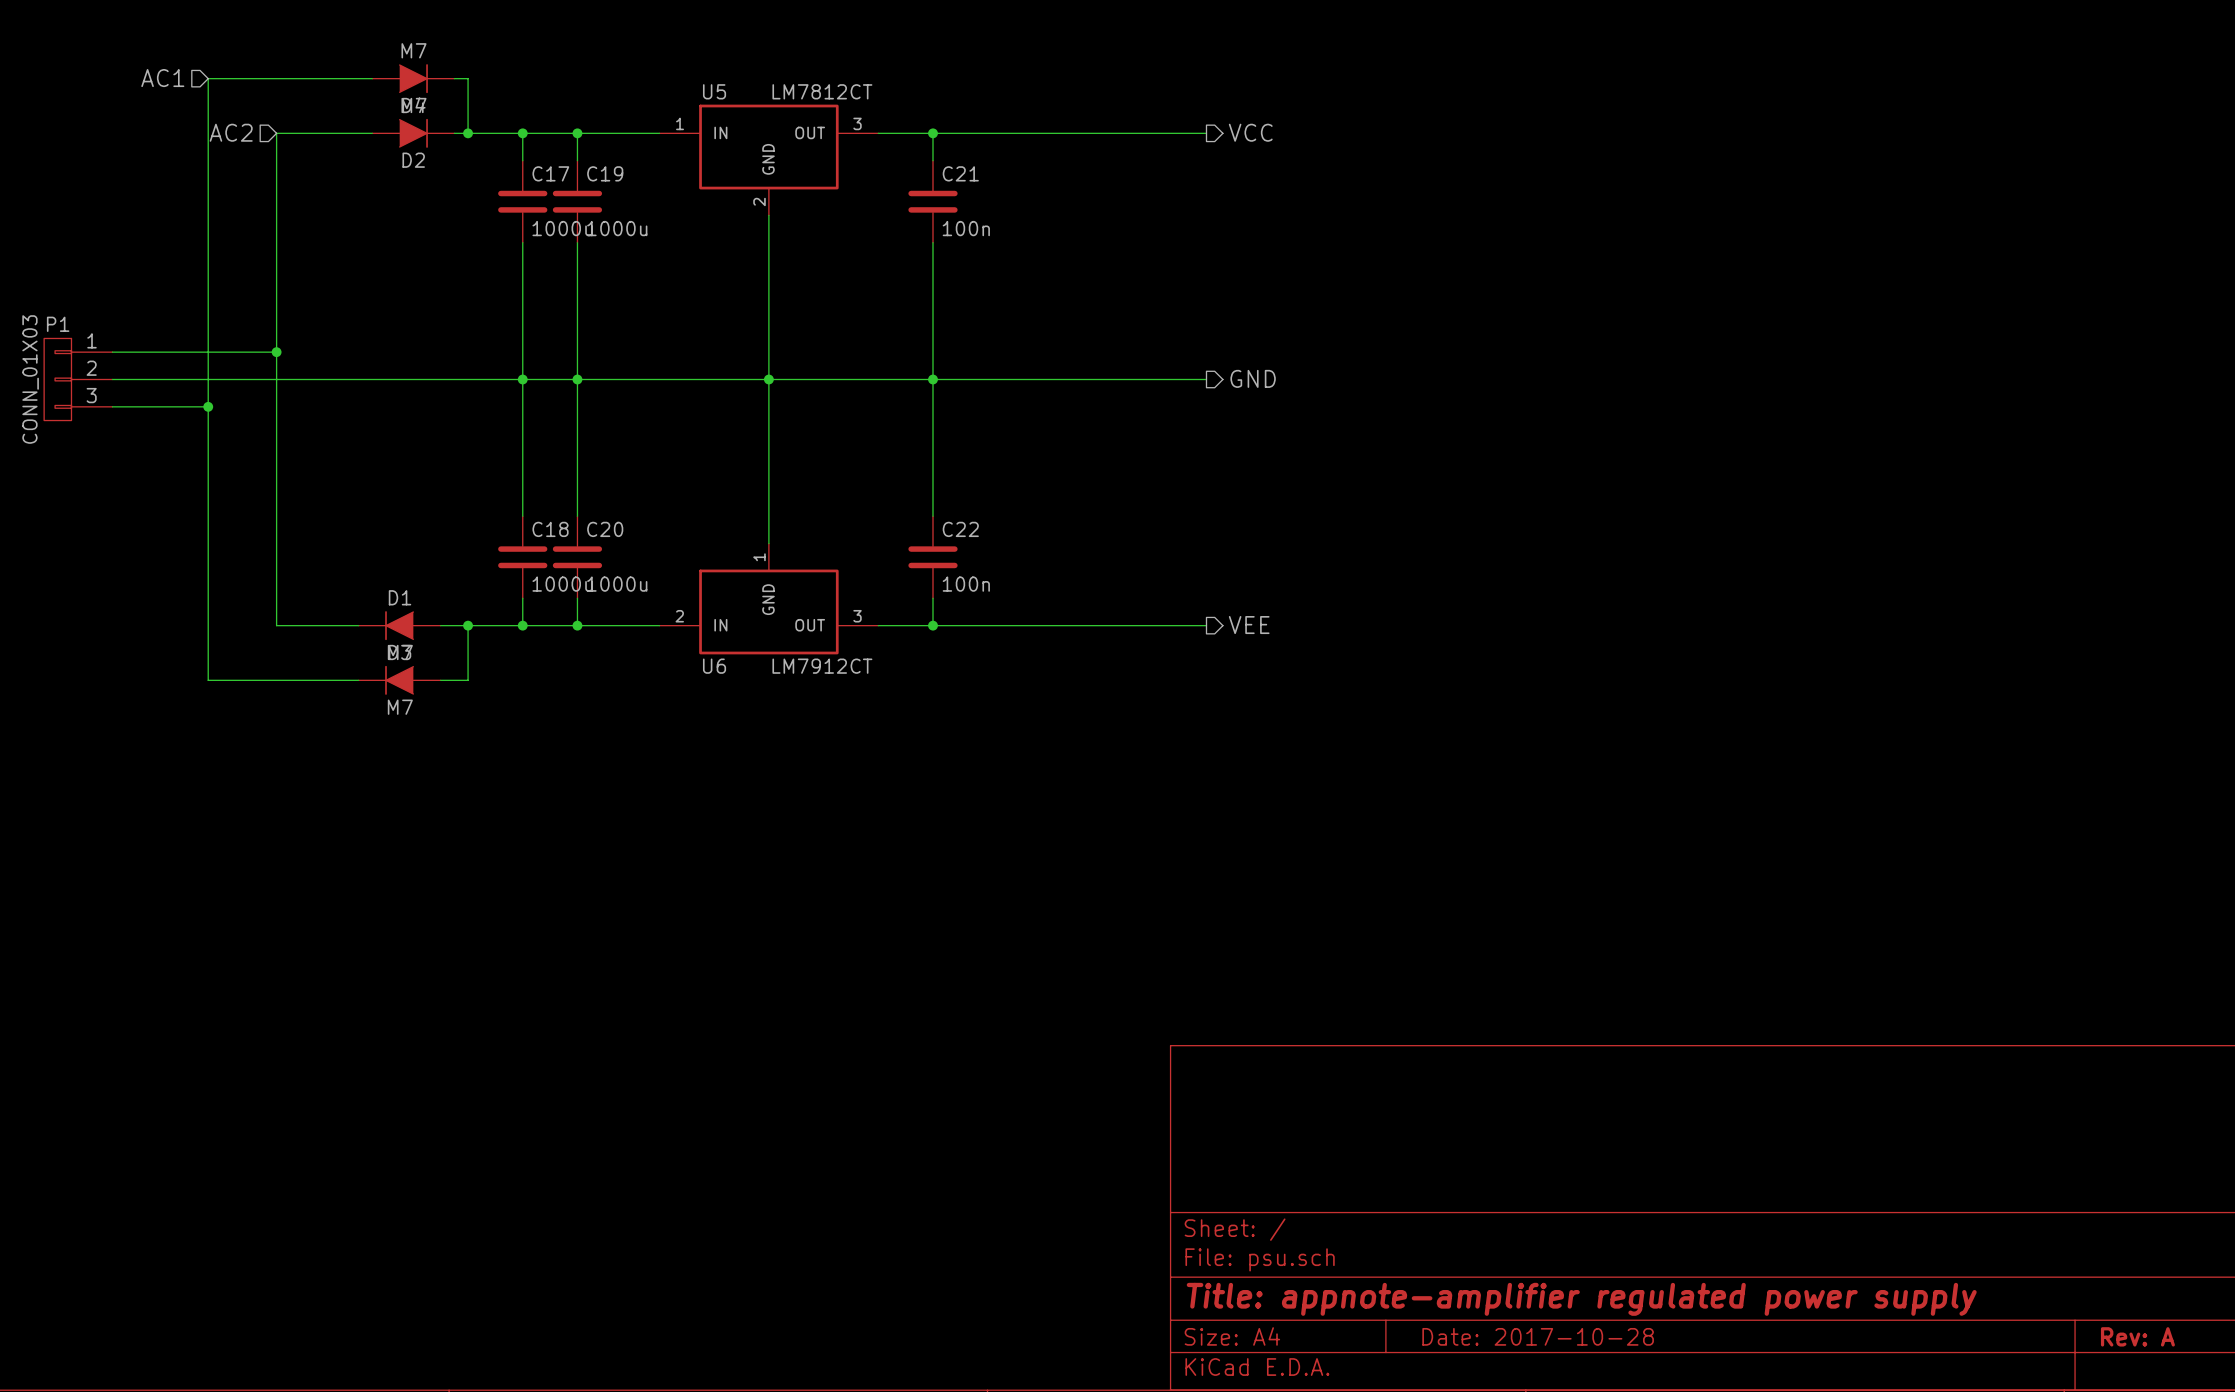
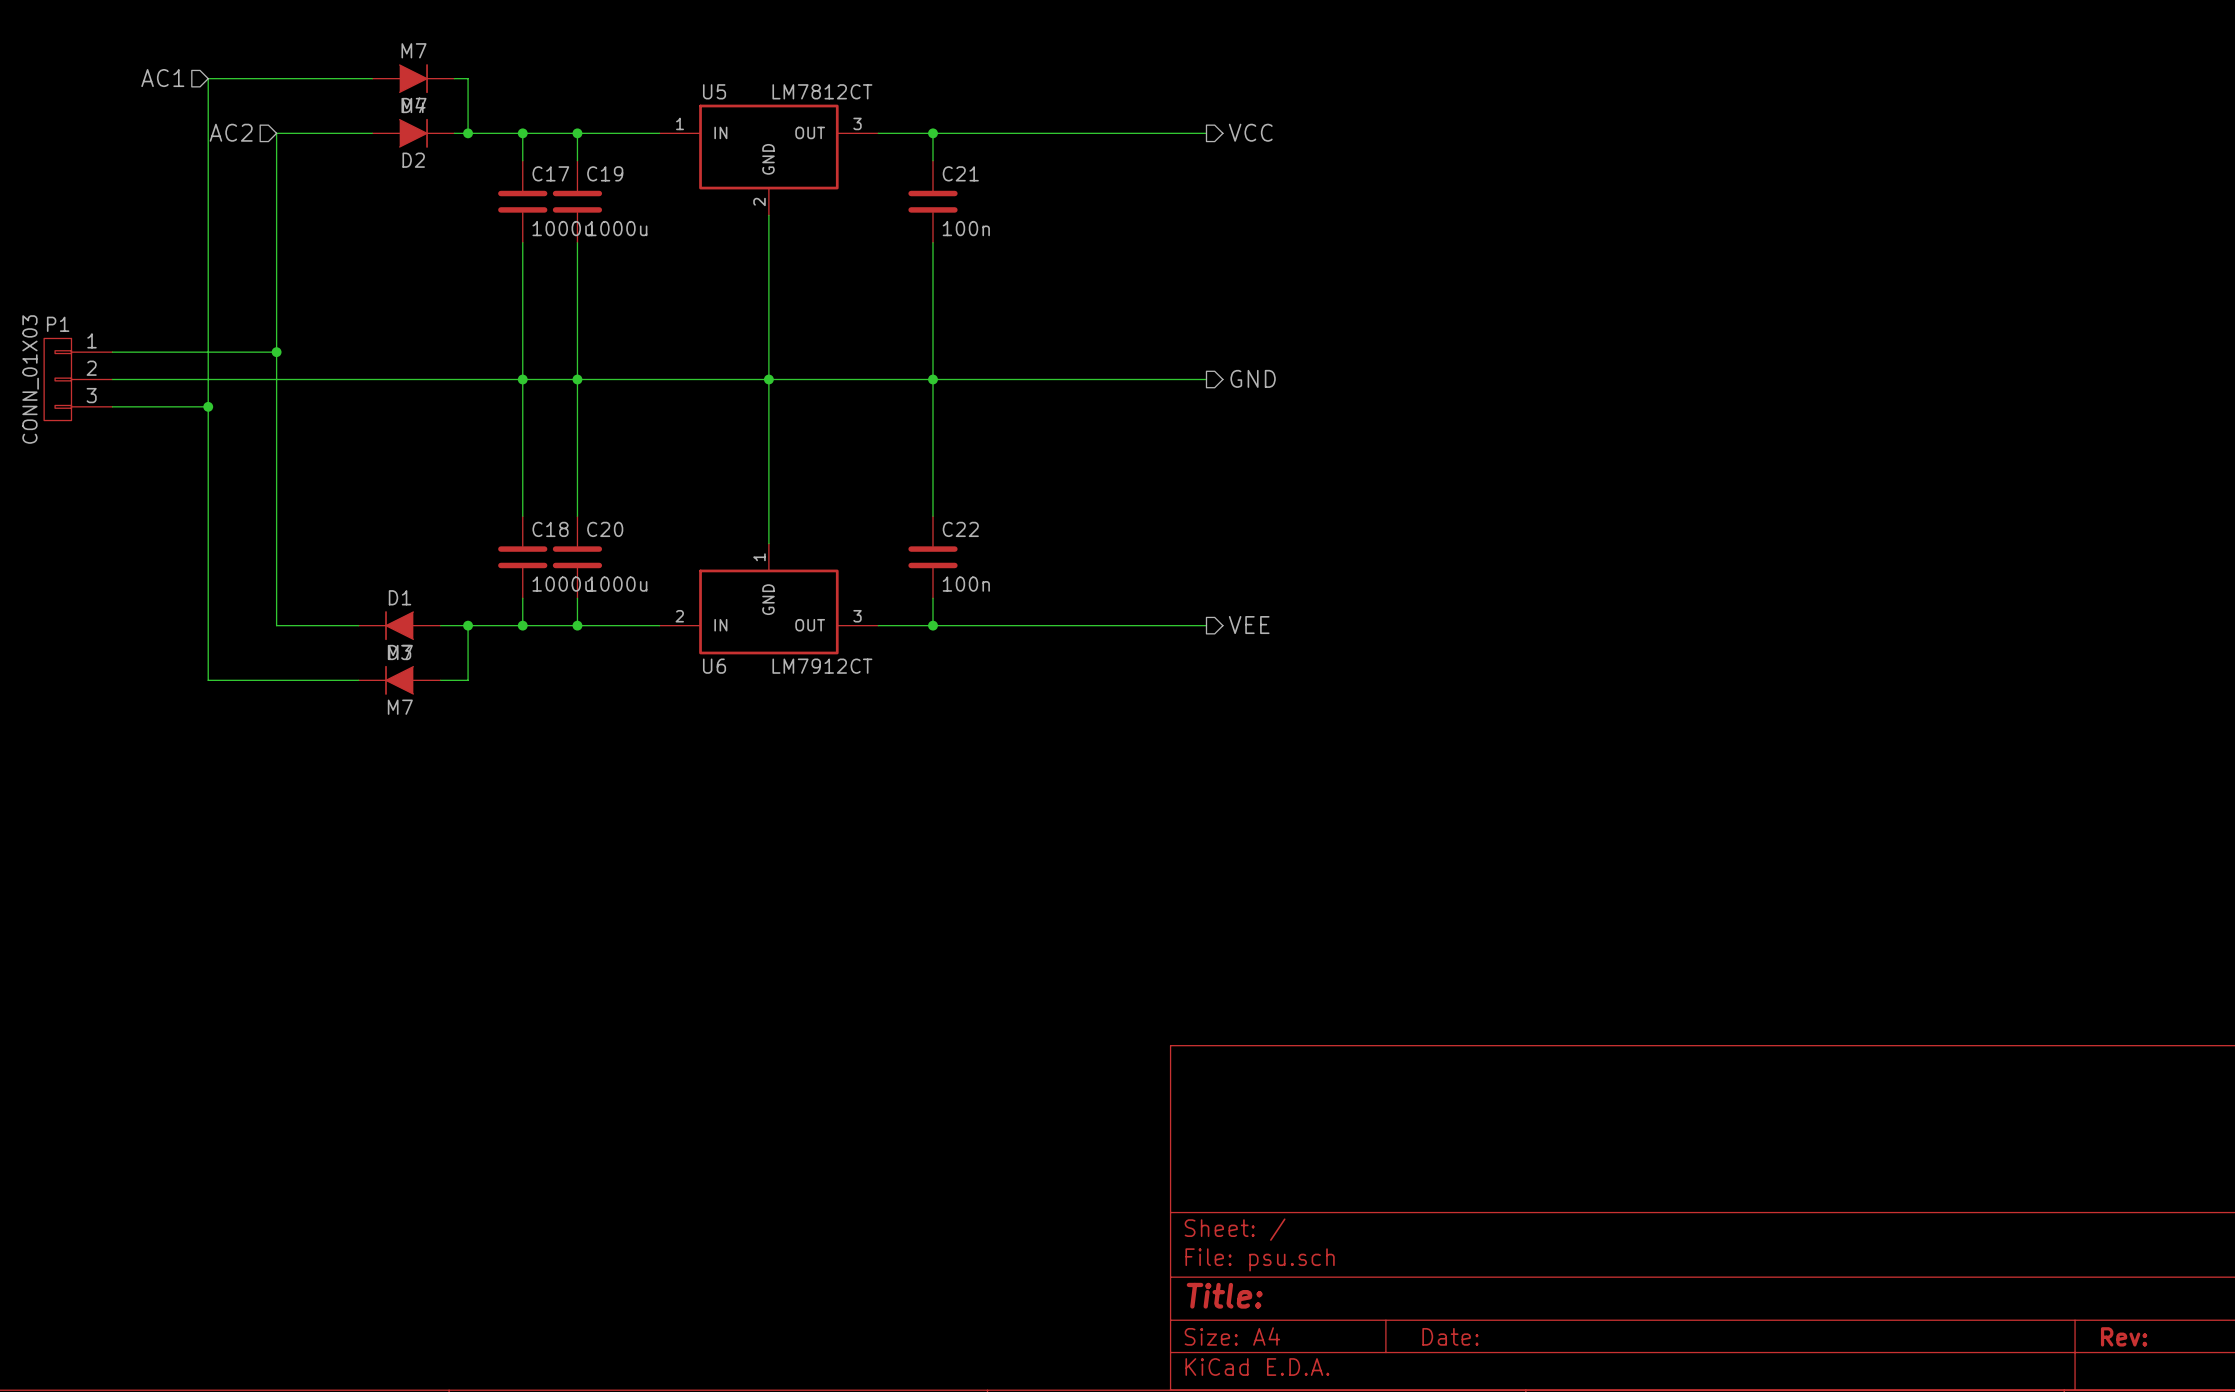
title block: Title: appnote-amplifier regulated power supply (1581, 1299) -> Title: (1224, 1295)
title block: Date: 2017-10-28 (1538, 1336) -> Date: (1450, 1336)
title block: Rev: A (2137, 1336) -> Rev: (2124, 1336)

